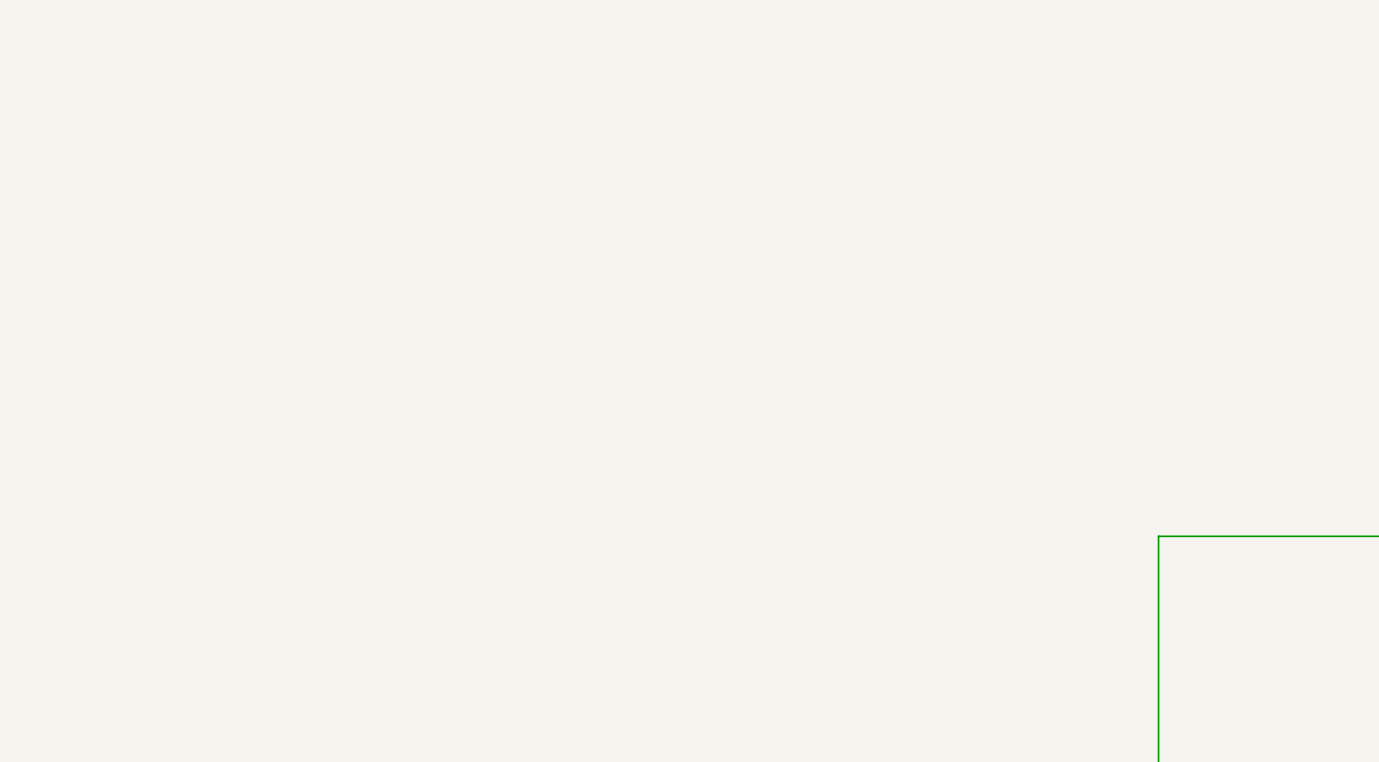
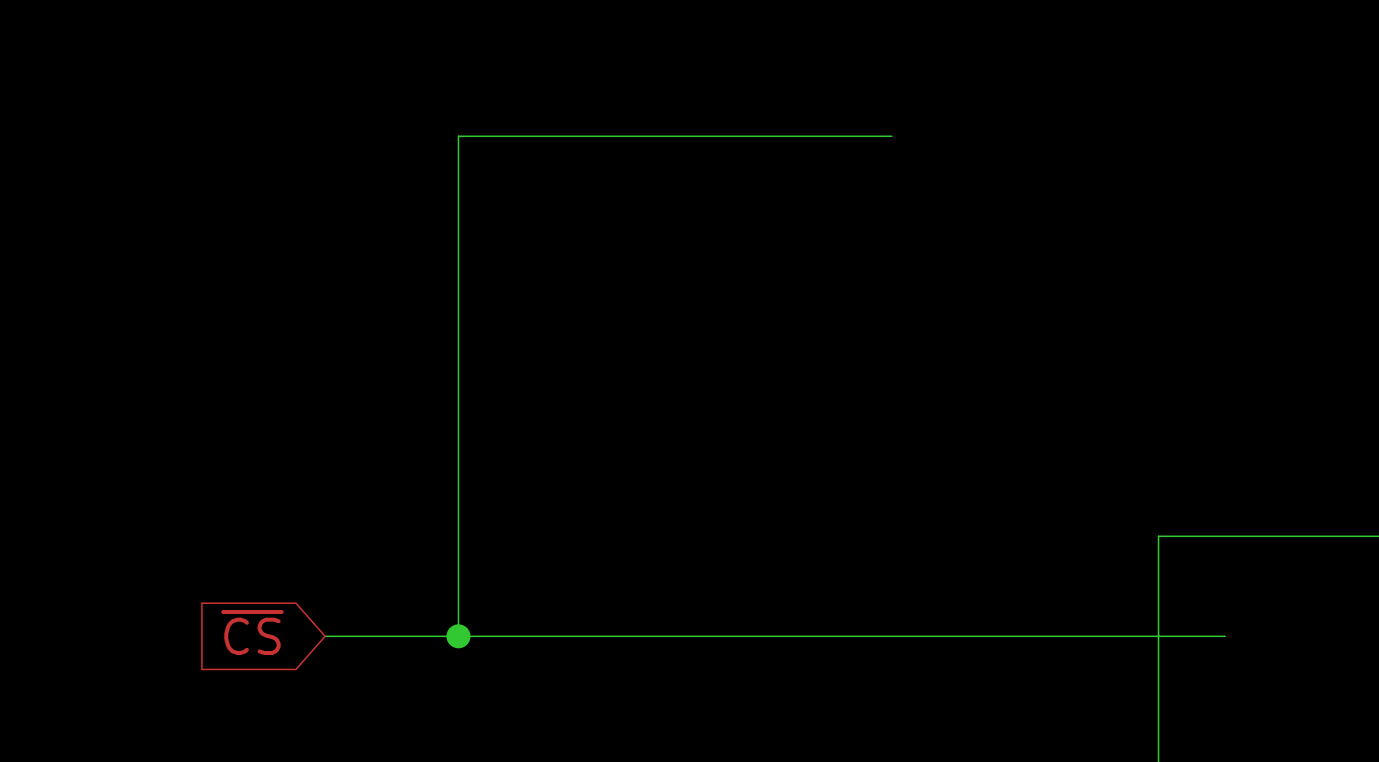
wire: none -> (891, 136) (458, 136) (458, 636)
global label: none -> ~{CS} (252, 632)
wire: none -> (325, 636) (1225, 636)
junction: none -> (458, 636)

